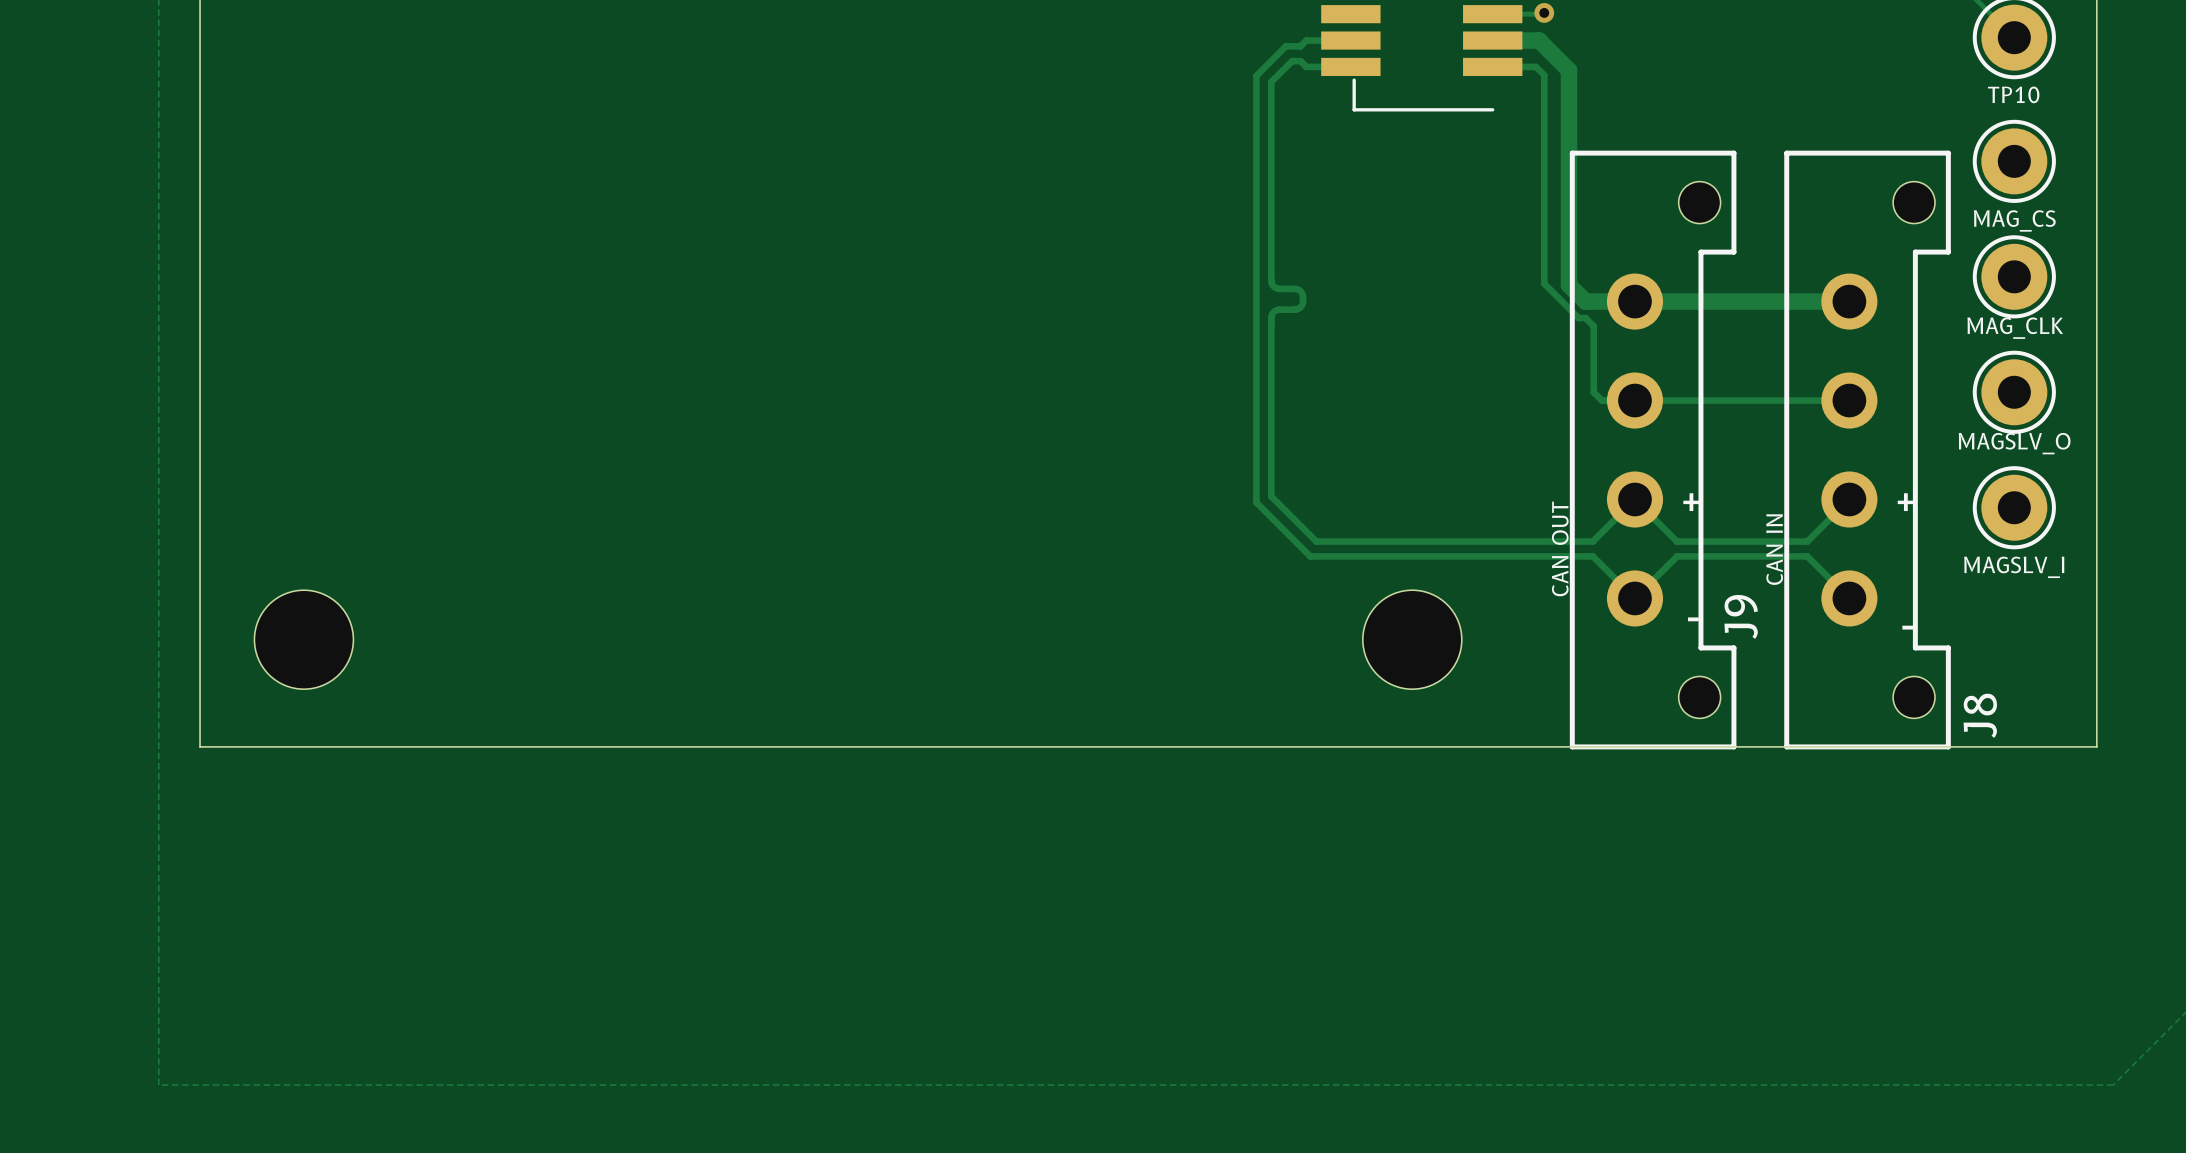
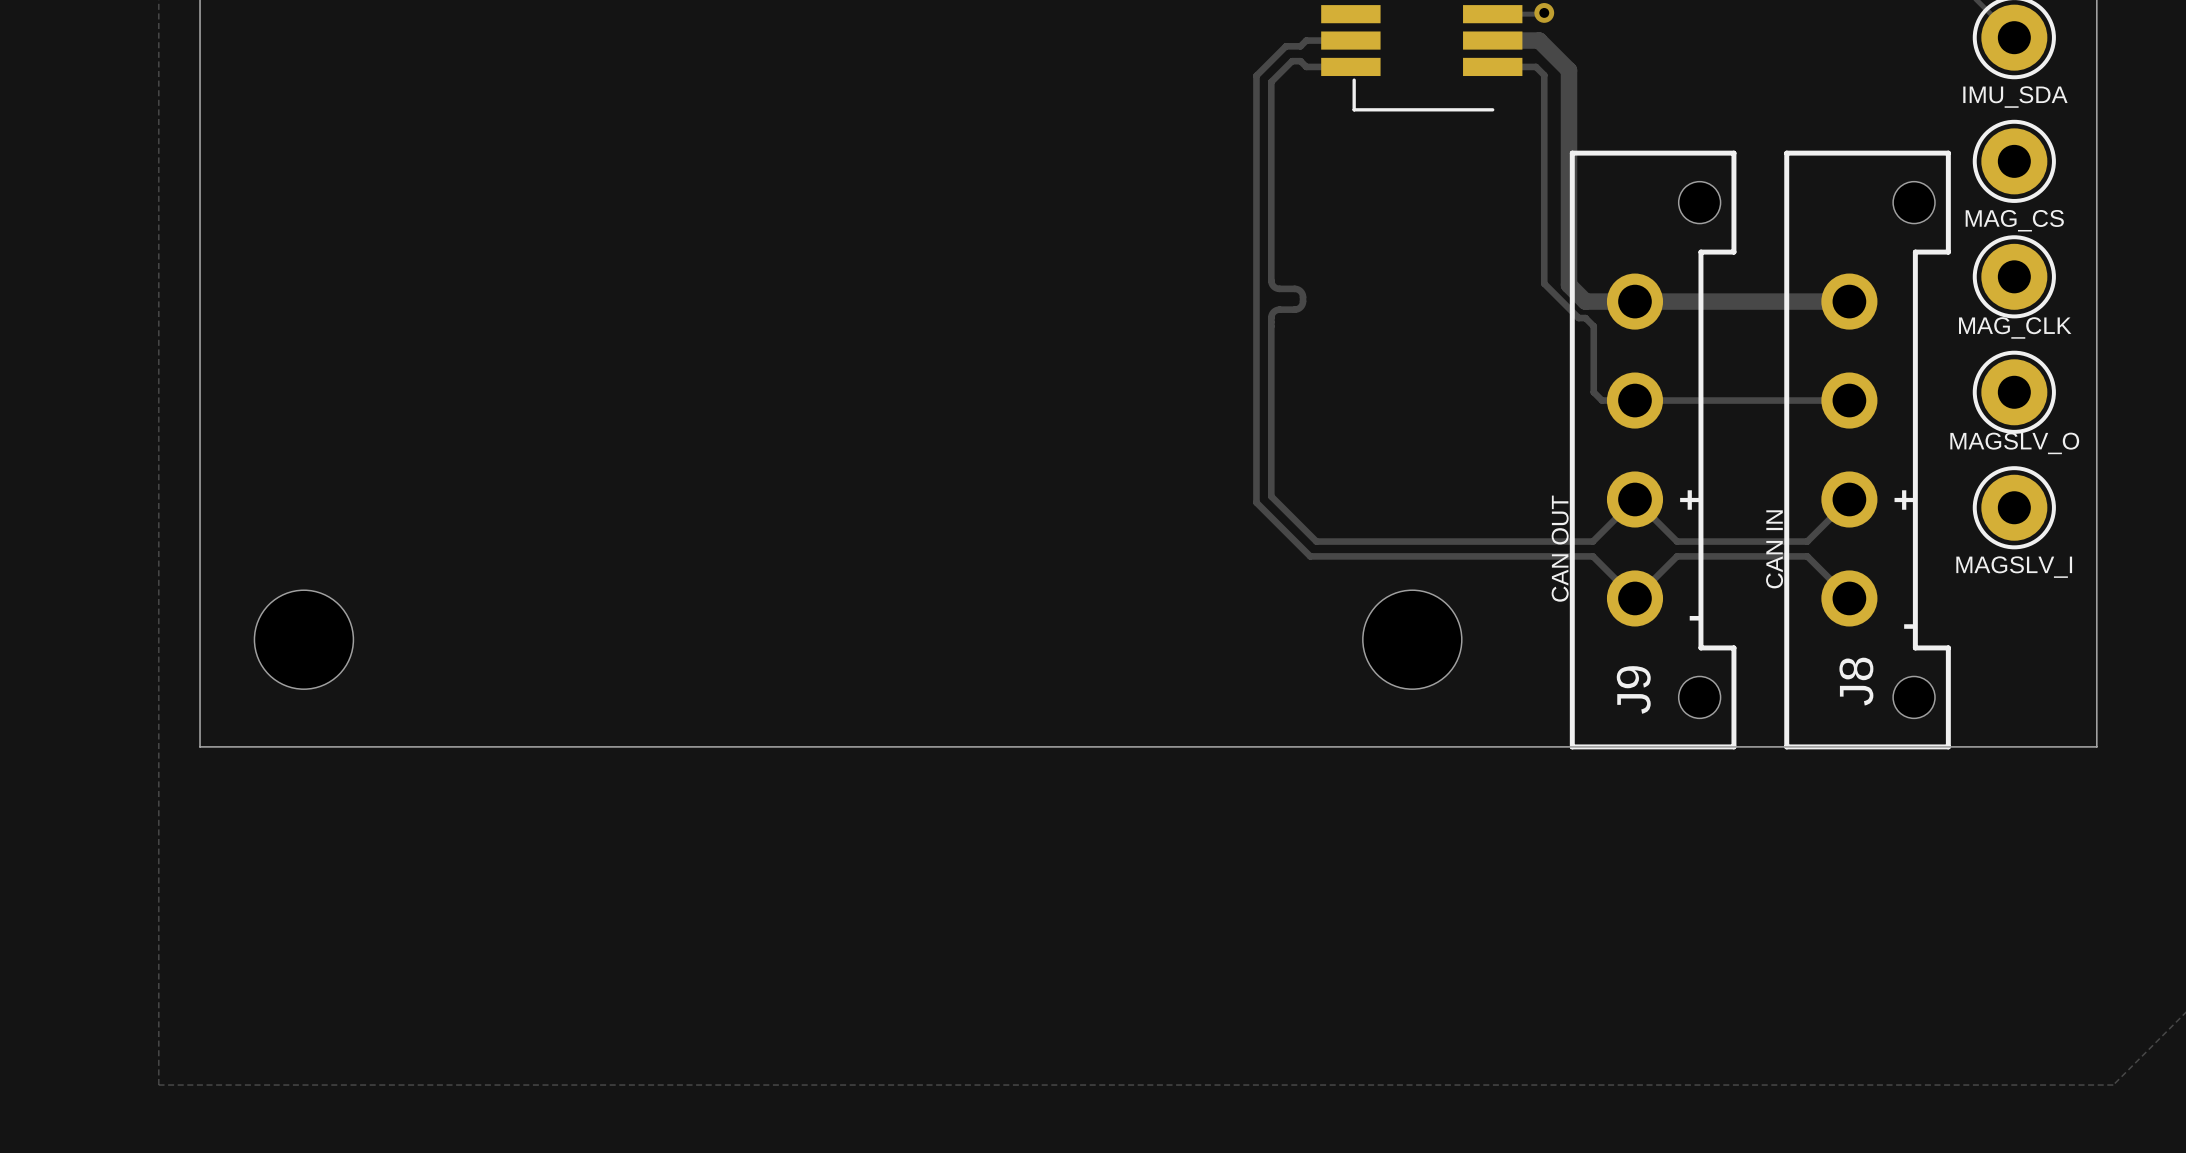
TP10 name: TP10 (2013, 94) -> none
text: none -> IMU_SDA (2015, 97)
J9 name position: J9 (1741, 616) -> J9 (1633, 689)
J8 name position: J8 (1980, 715) -> J8 (1856, 681)

